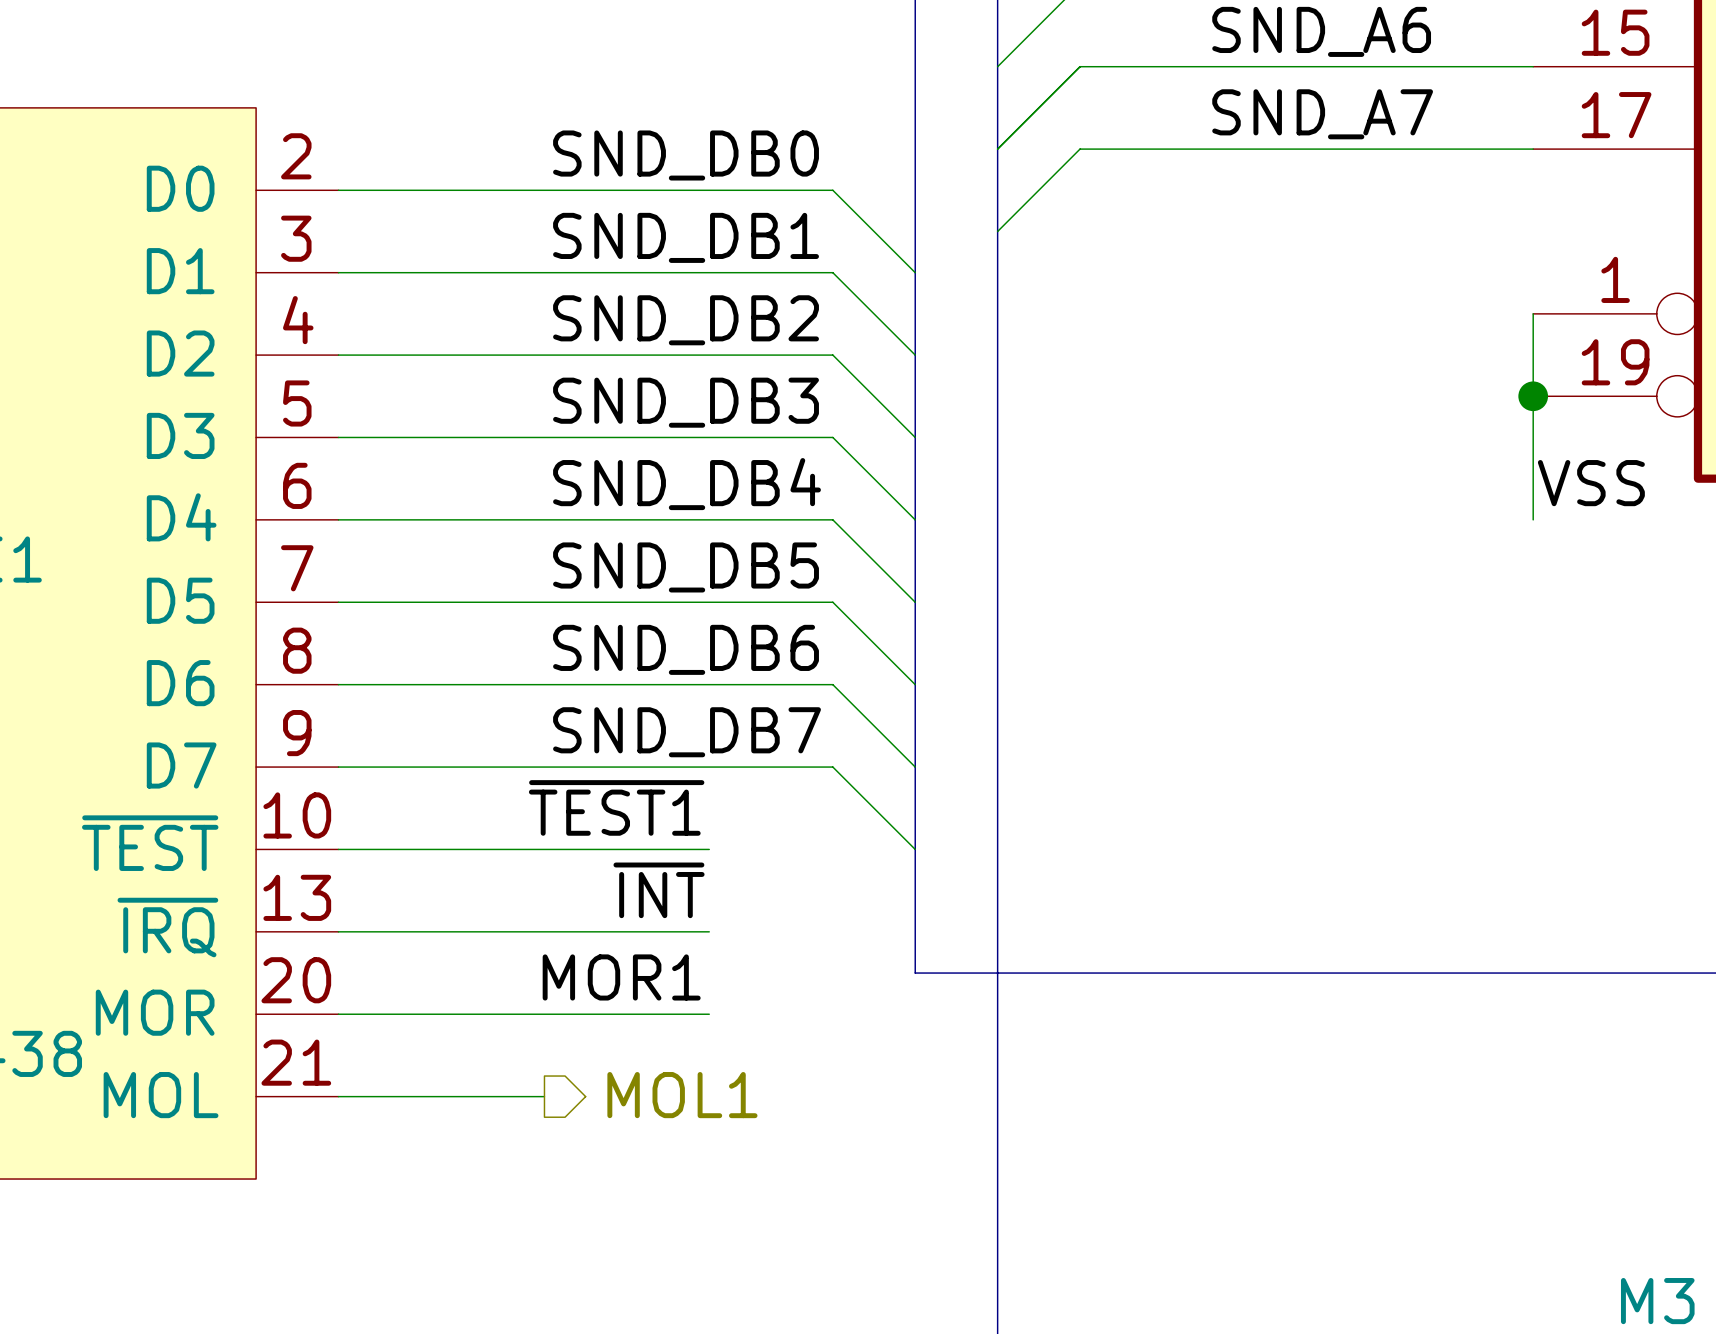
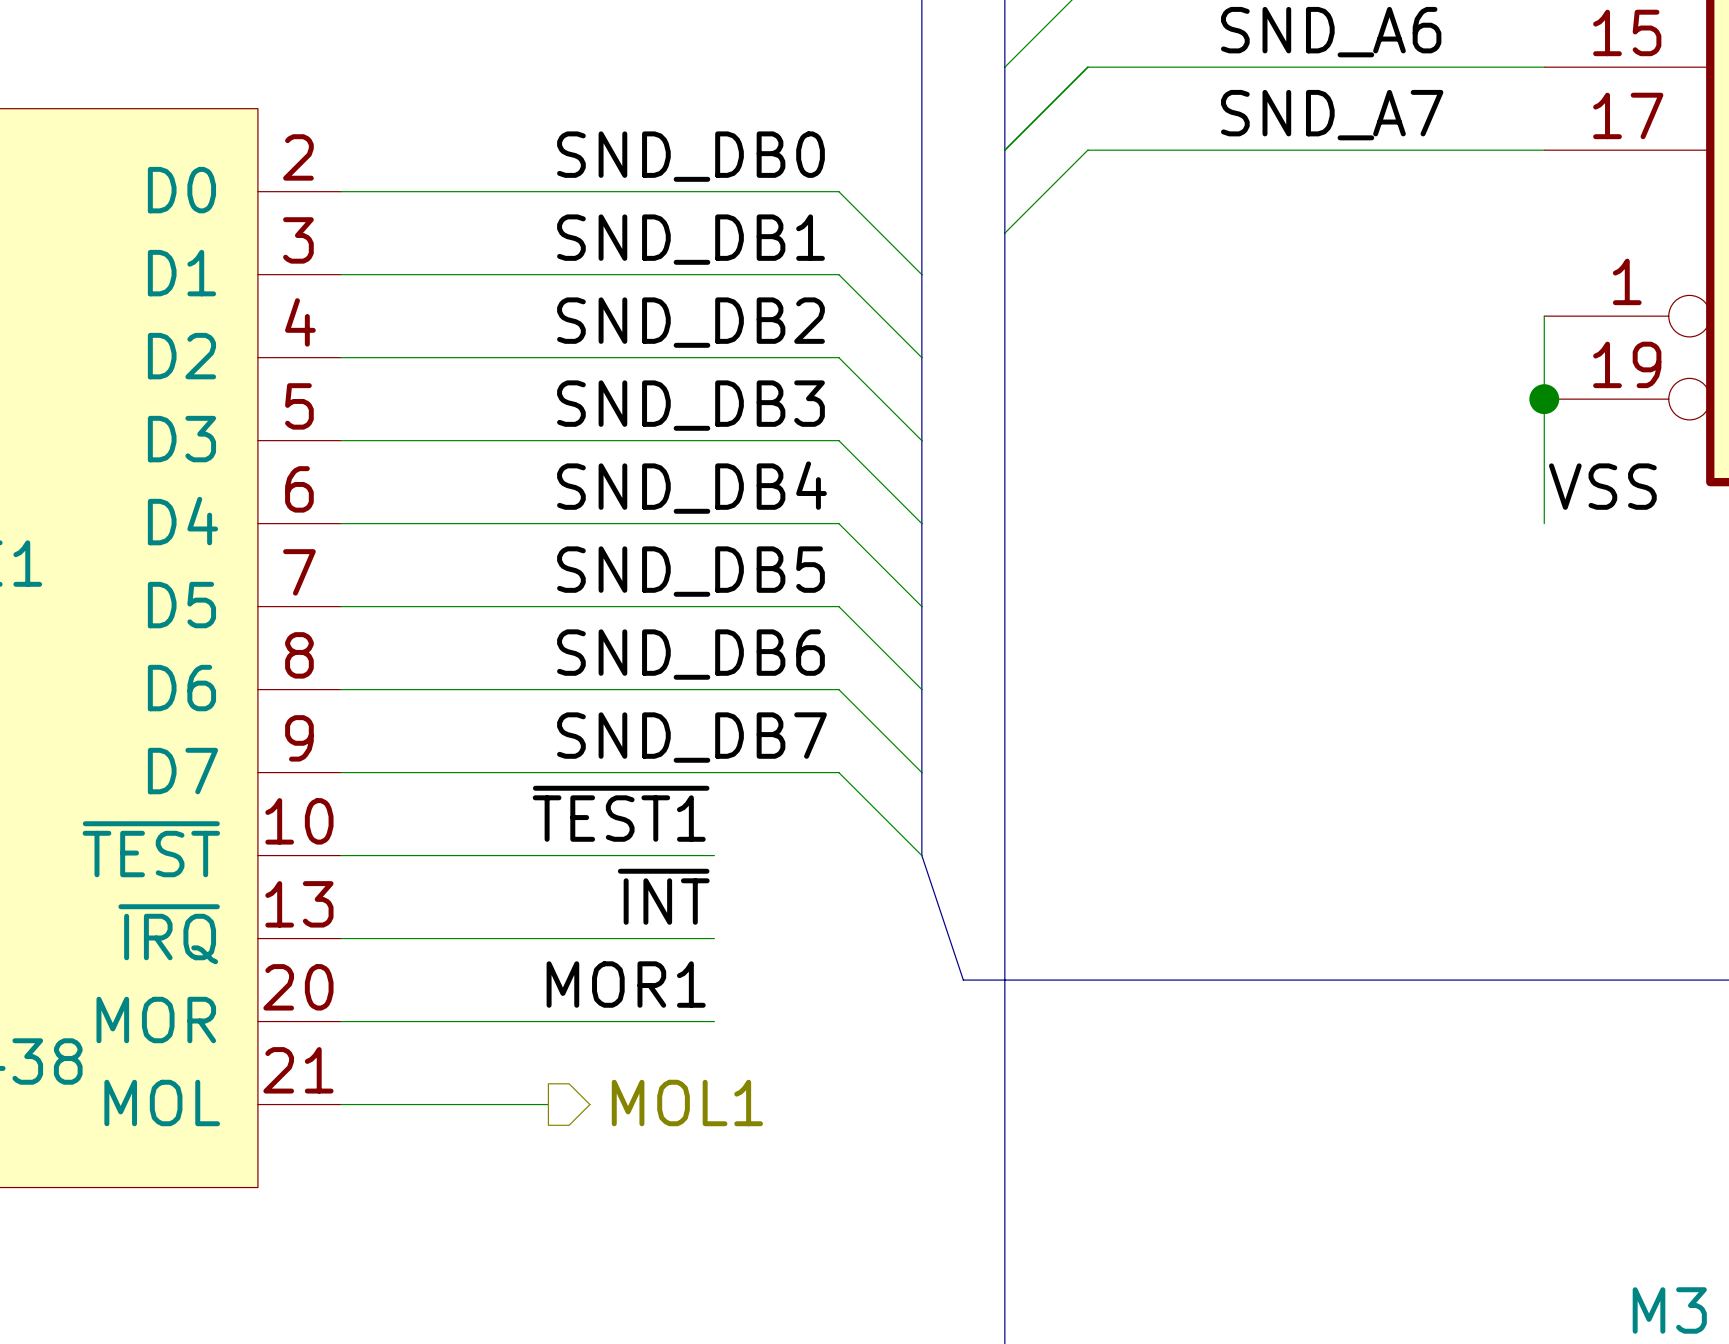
bus: (915, 849) (915, 973) (956, 973) -> (921, 855) (963, 980)

